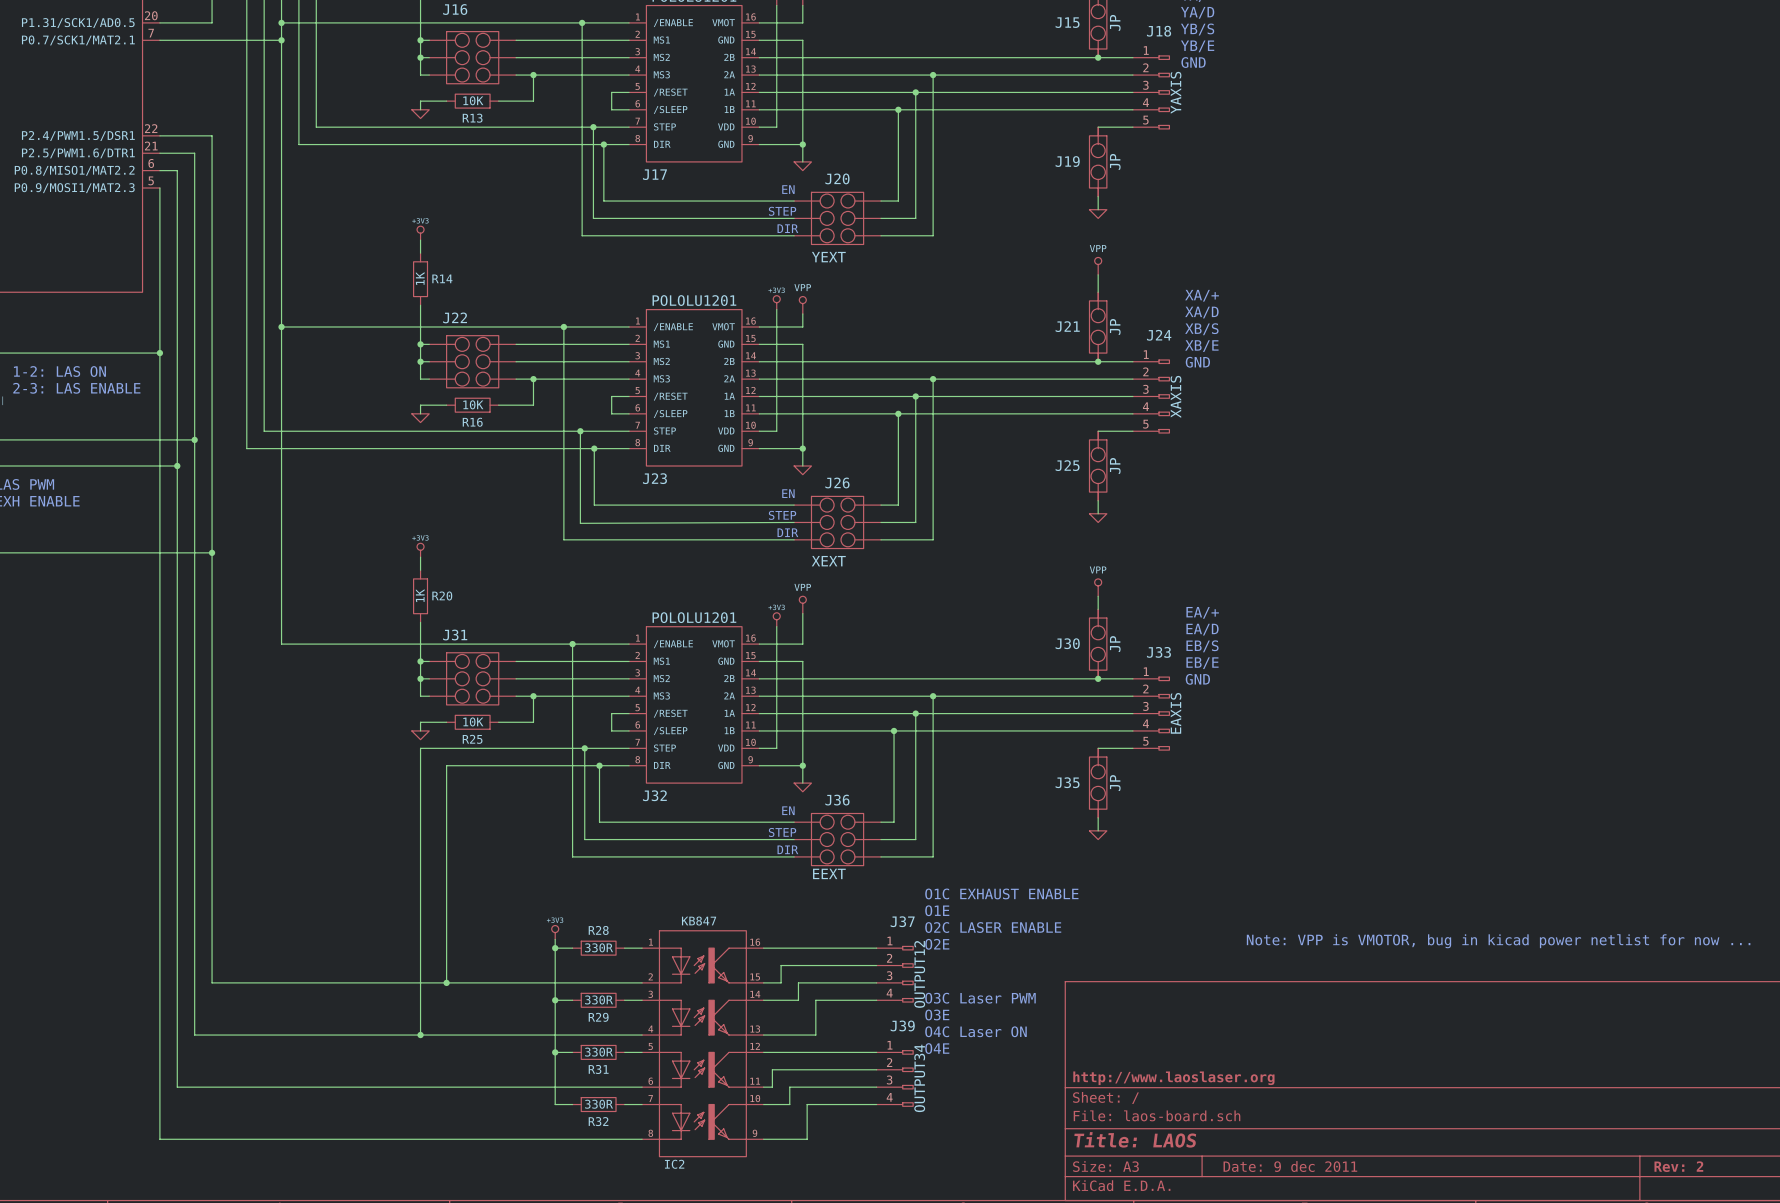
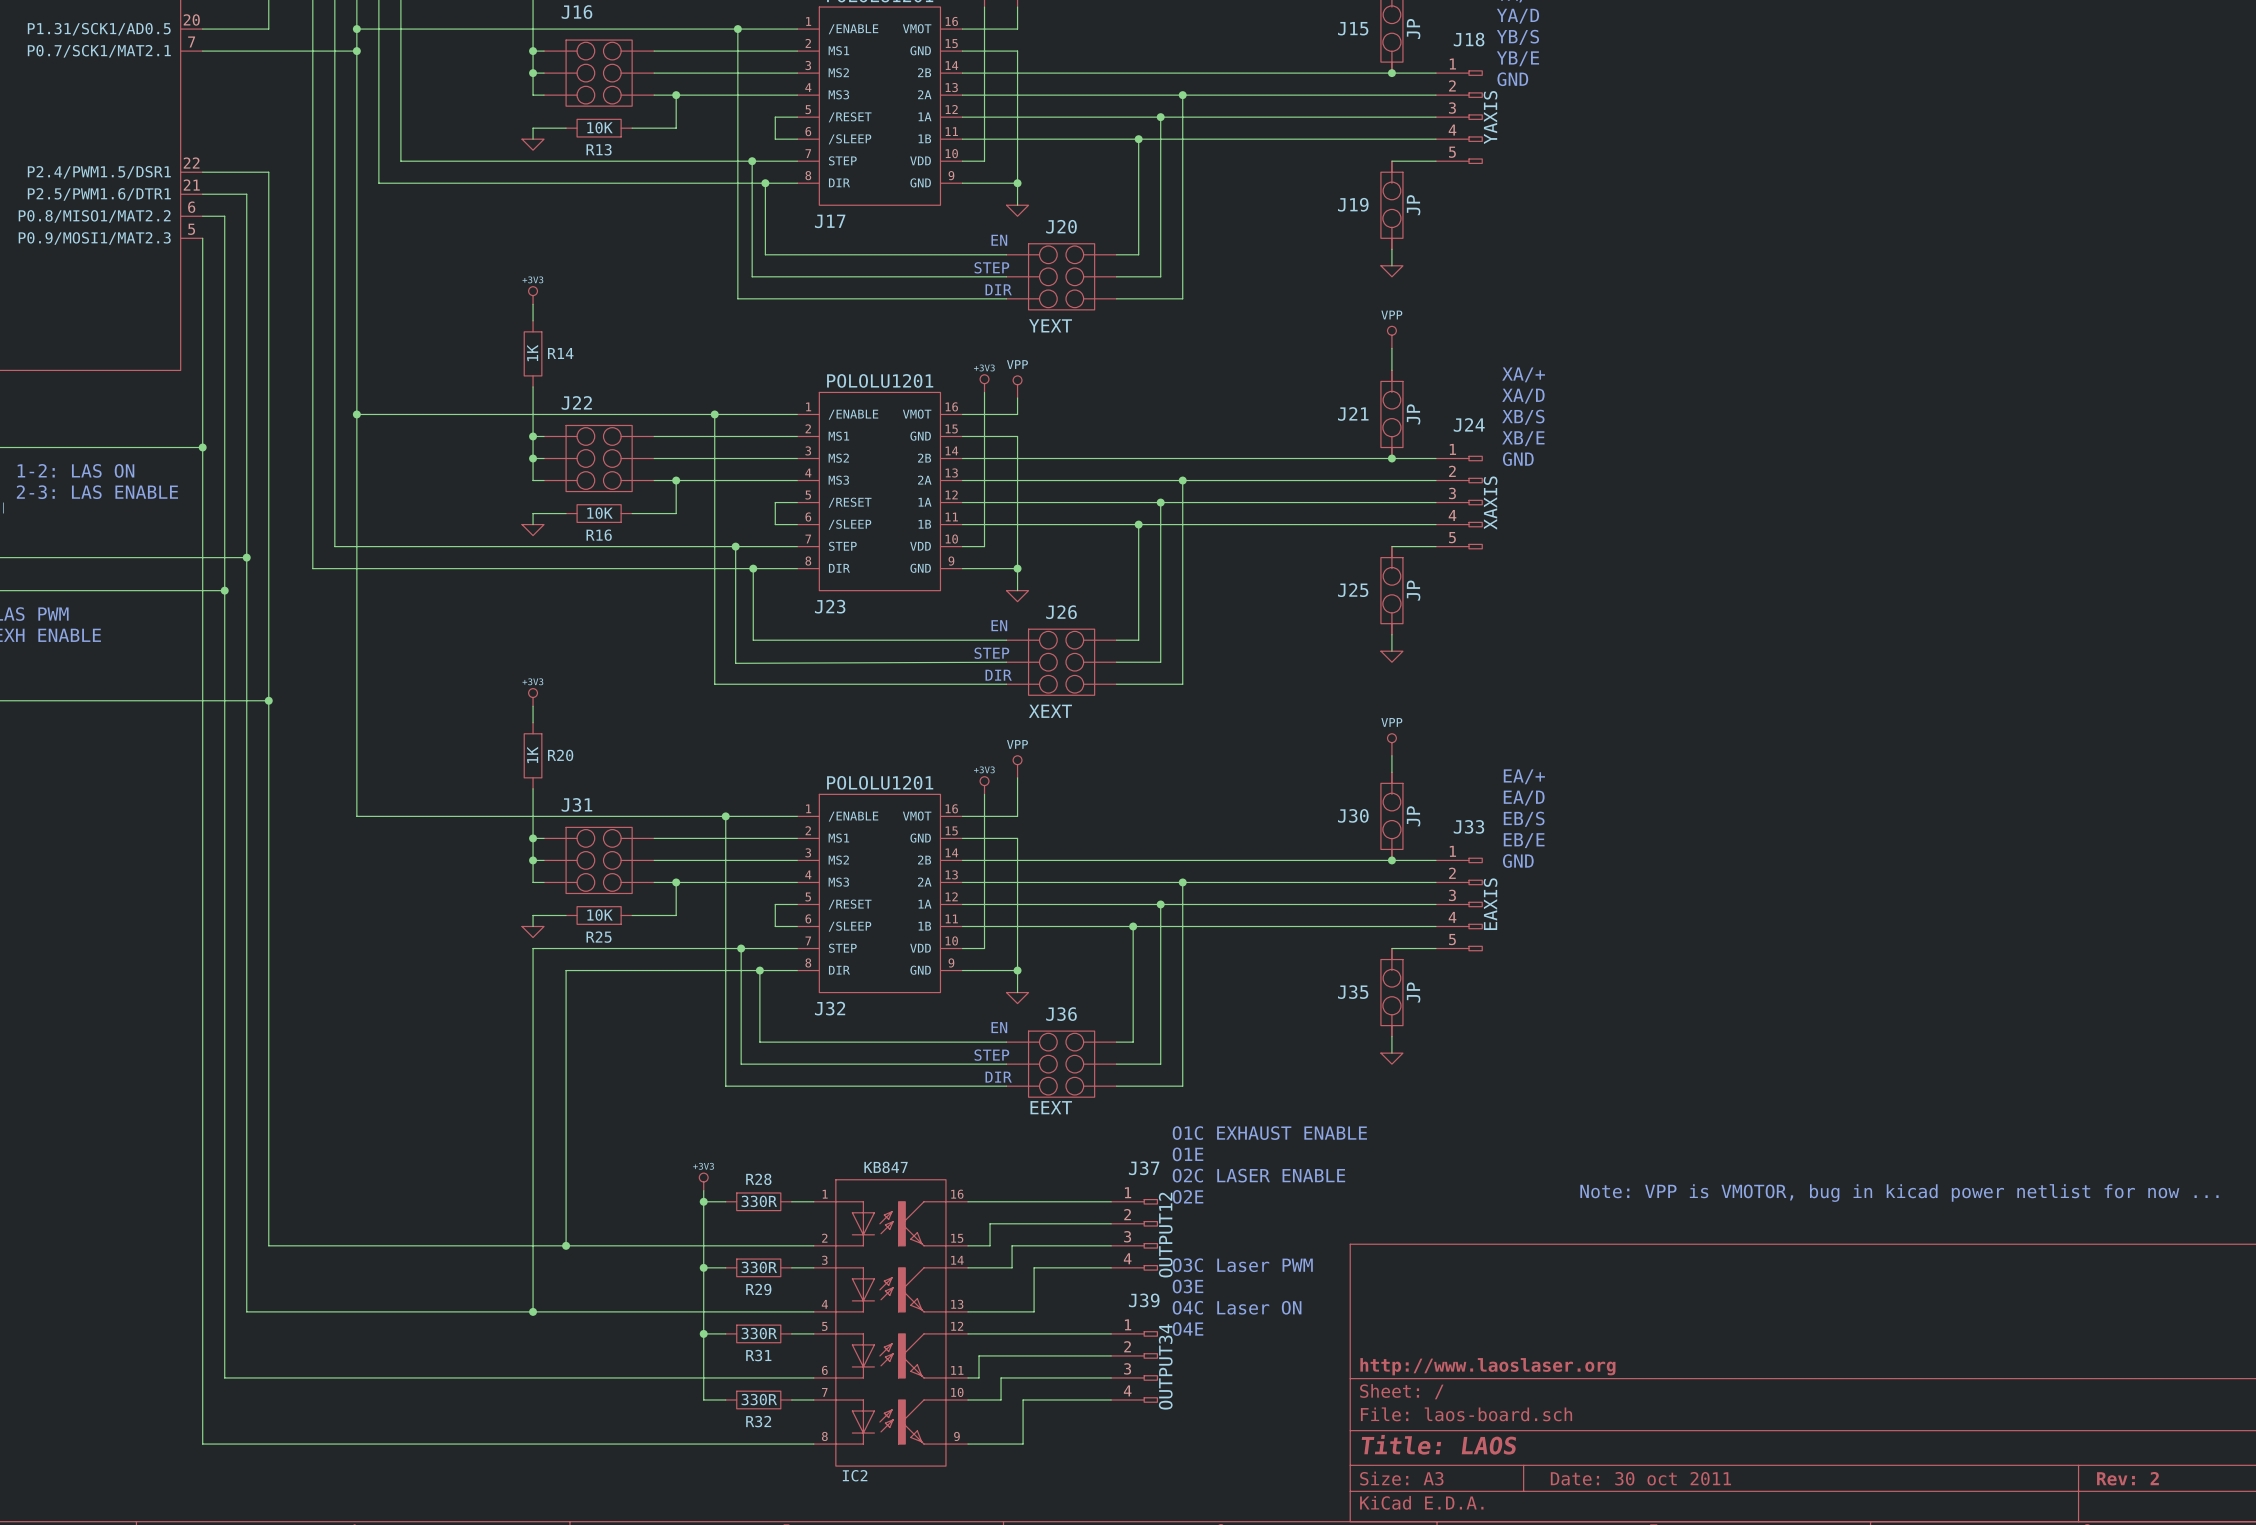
title block: Date: 9 dec 2011 (1290, 1166) -> Date: 30 oct 2011 (1640, 1478)

